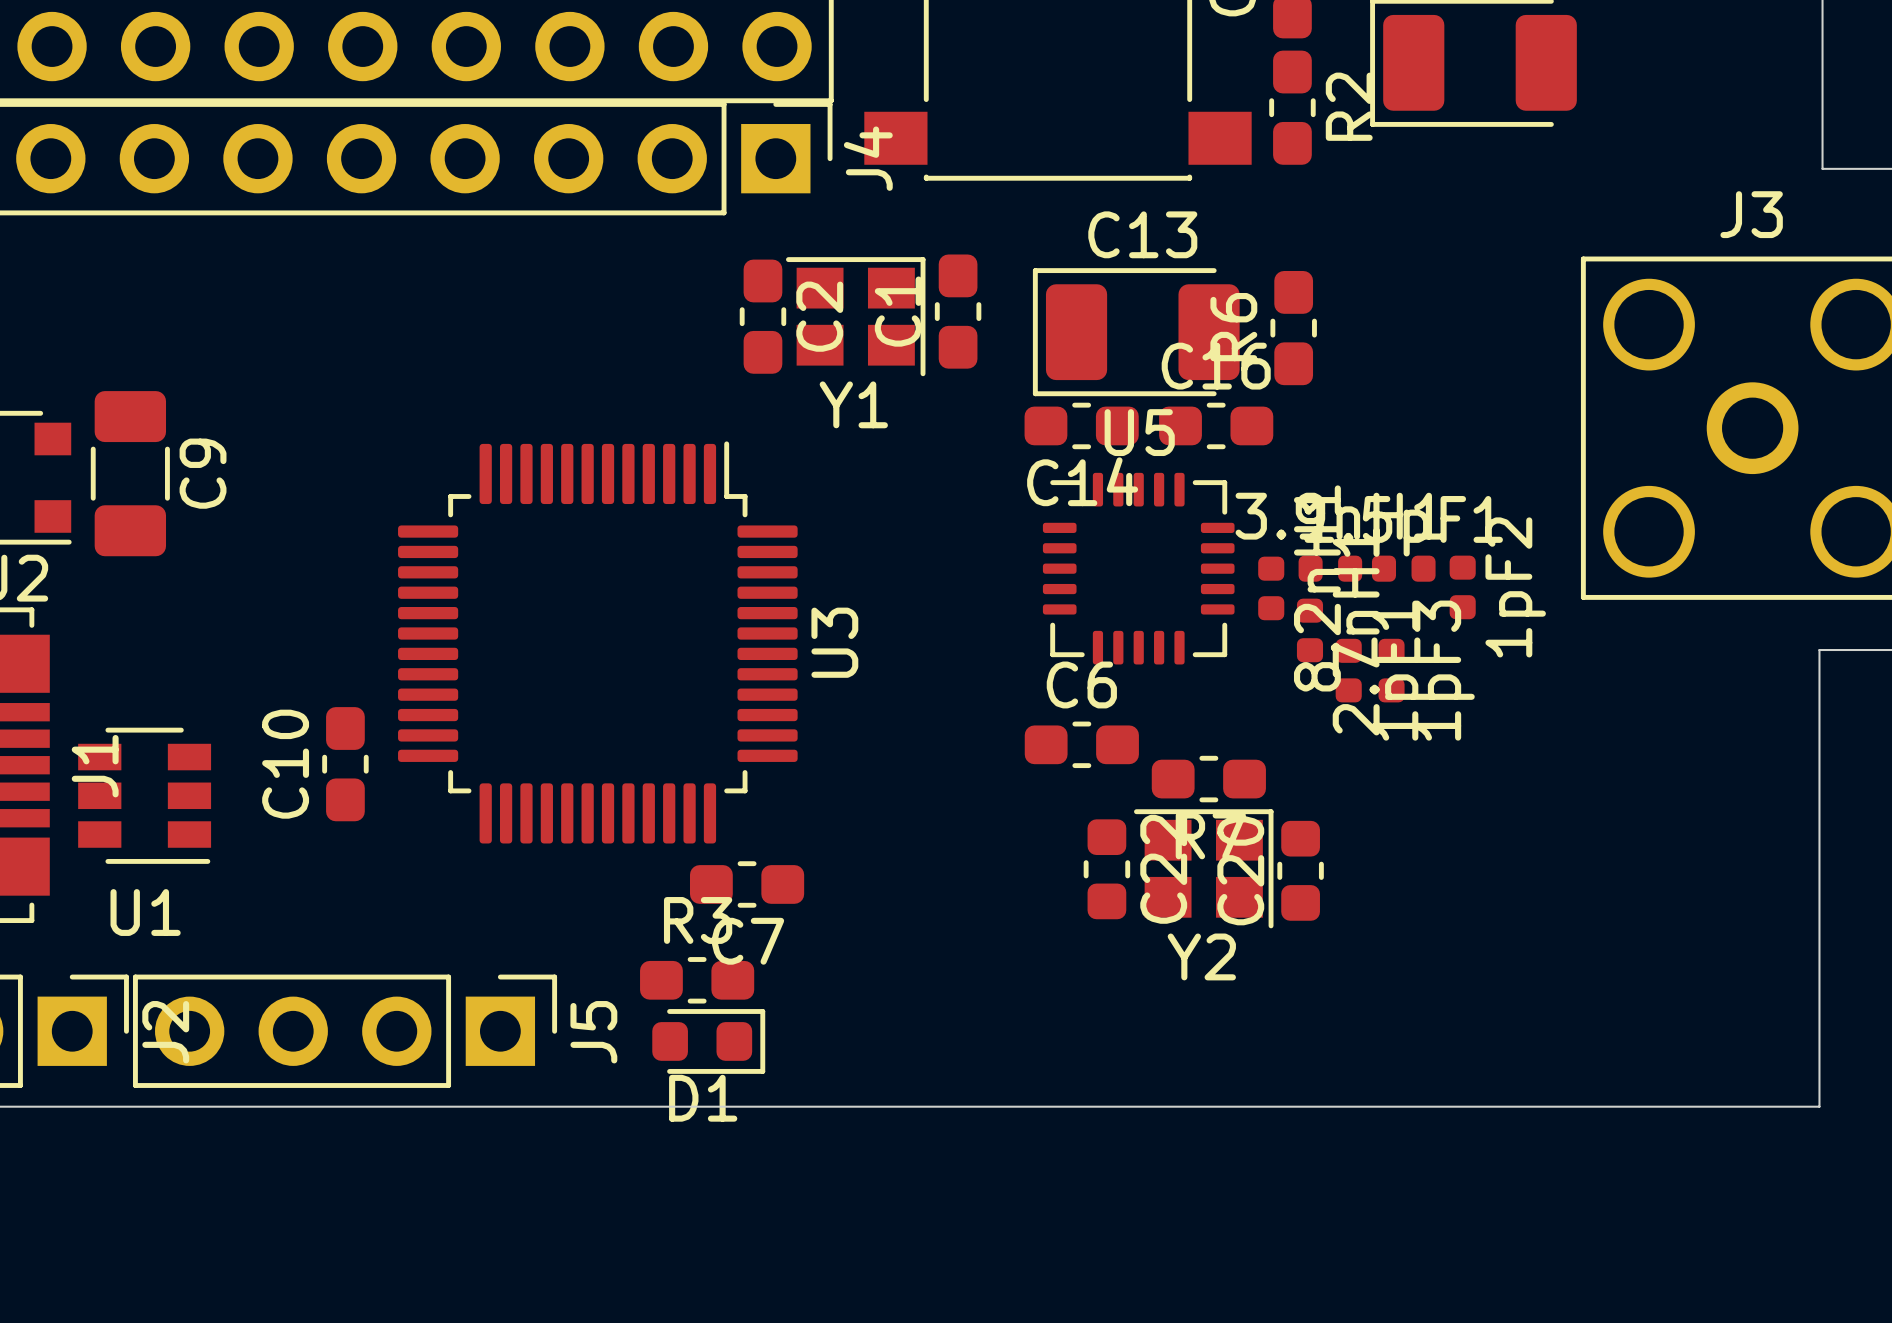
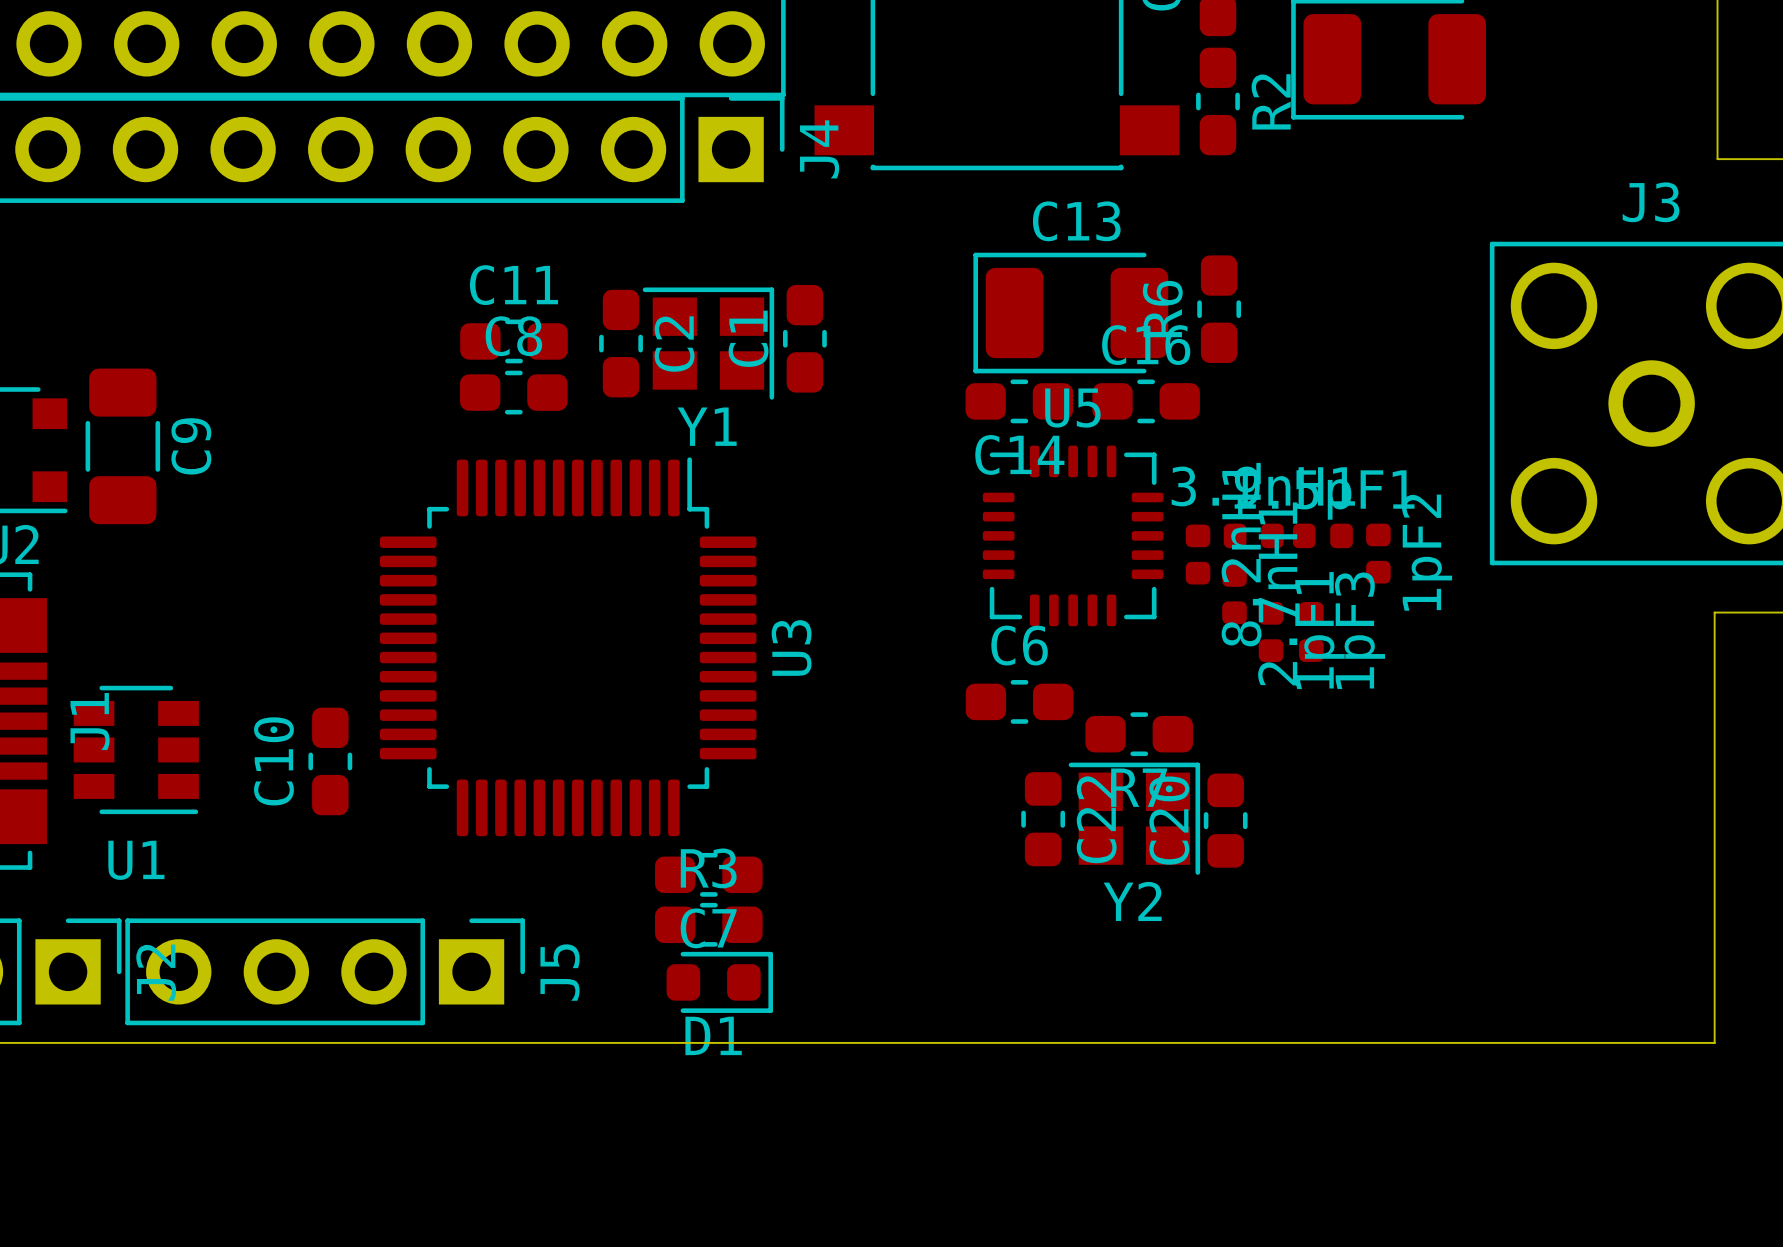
C1 position: (958, 311) -> (804, 338)
C2 position: (762, 316) -> (621, 343)
Y1 position: (855, 316) -> (708, 343)
C11: none -> (514, 341)
C8: none -> (513, 392)
U3 position: (597, 642) -> (568, 646)
C10 position: (345, 764) -> (330, 761)
C7 position: (747, 884) -> (708, 874)
R3 position: (697, 980) -> (708, 924)
D1 position: (708, 1041) -> (719, 982)

